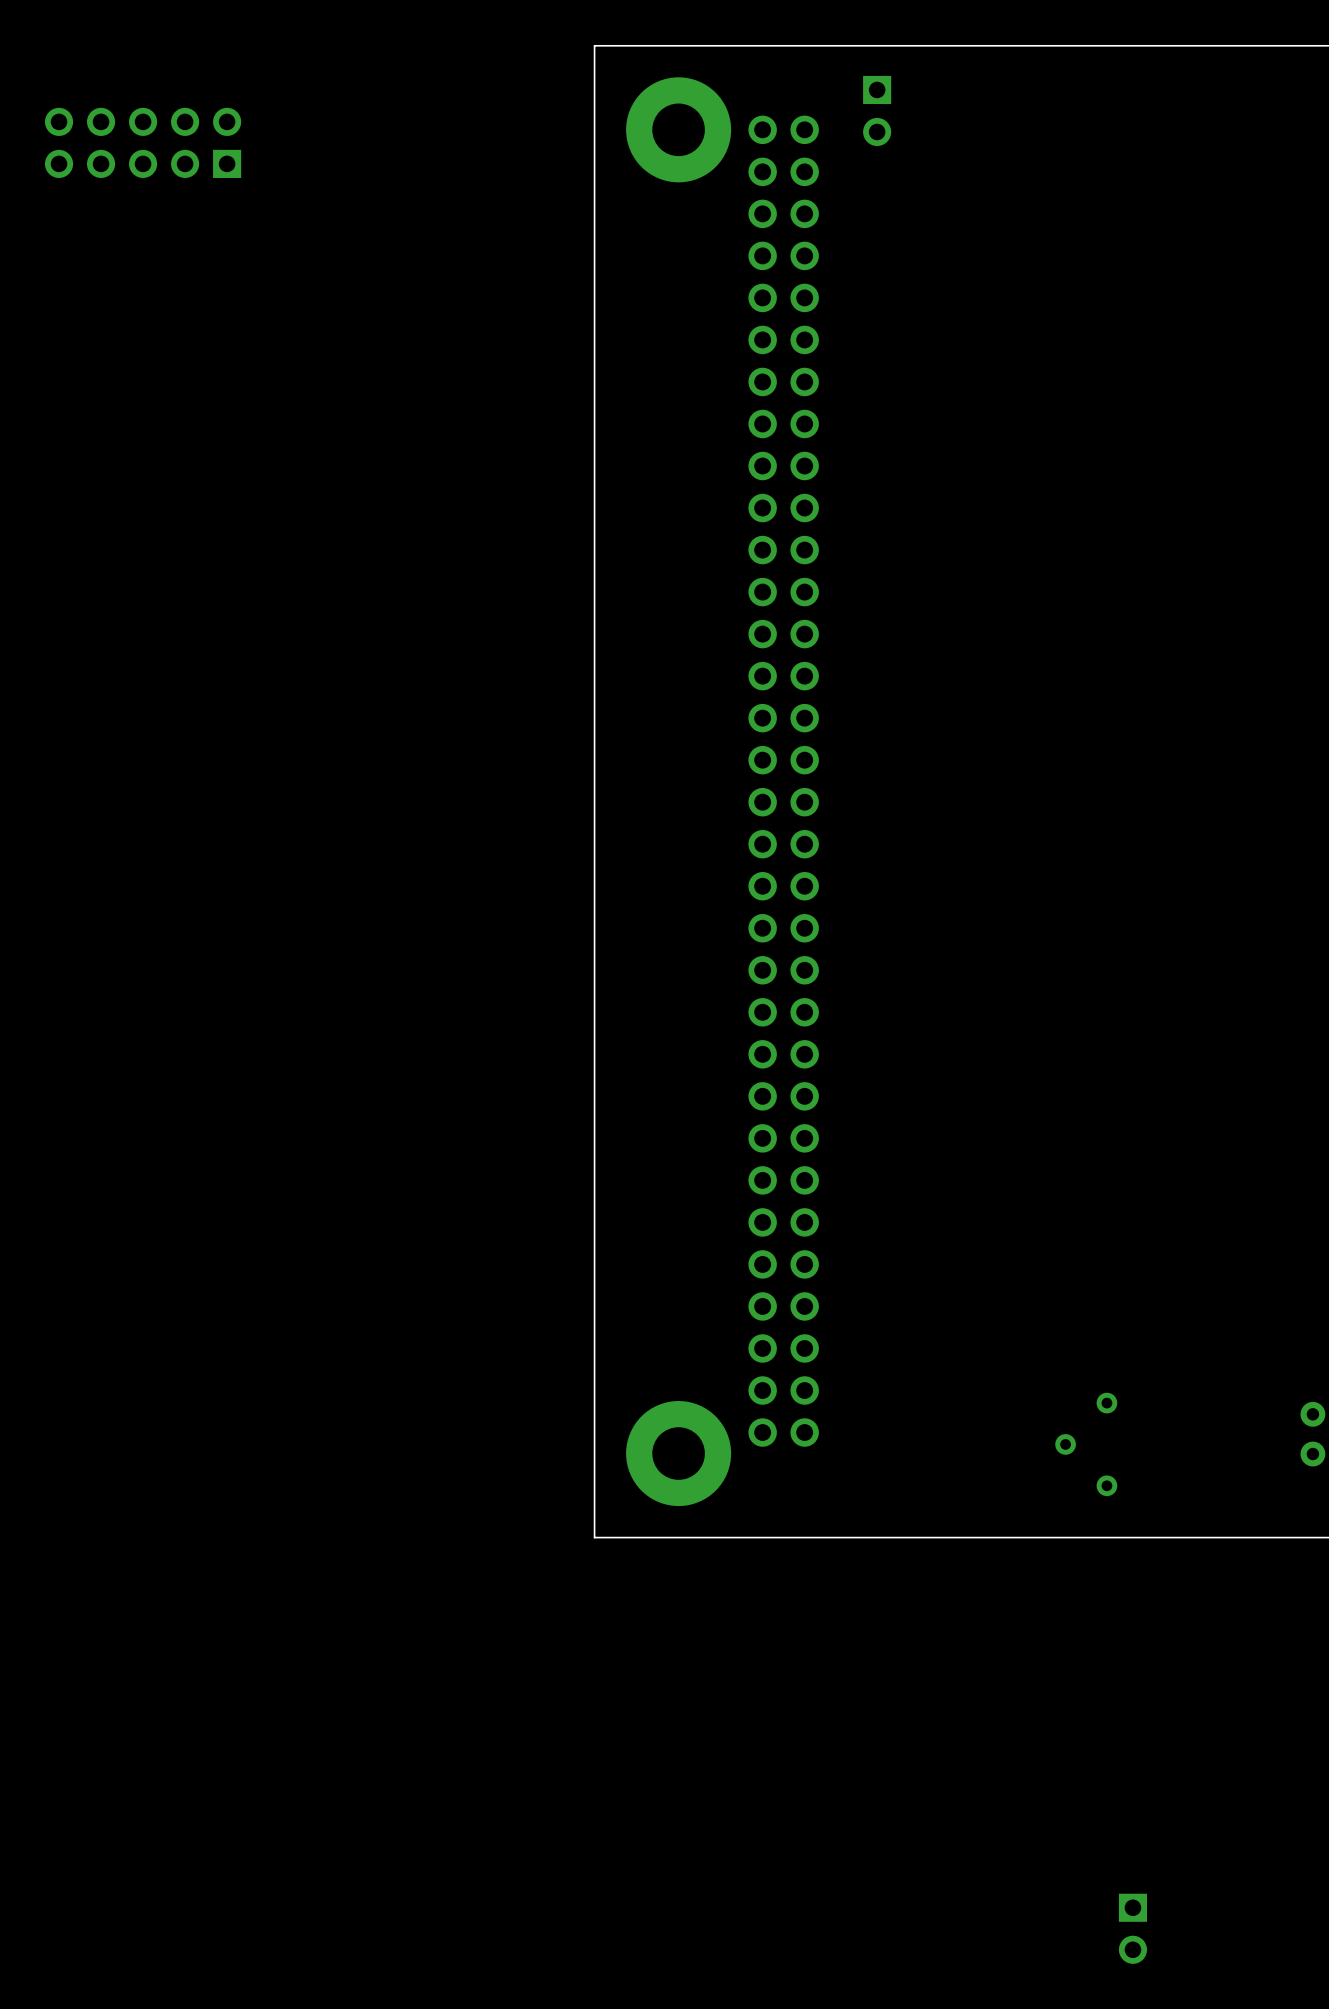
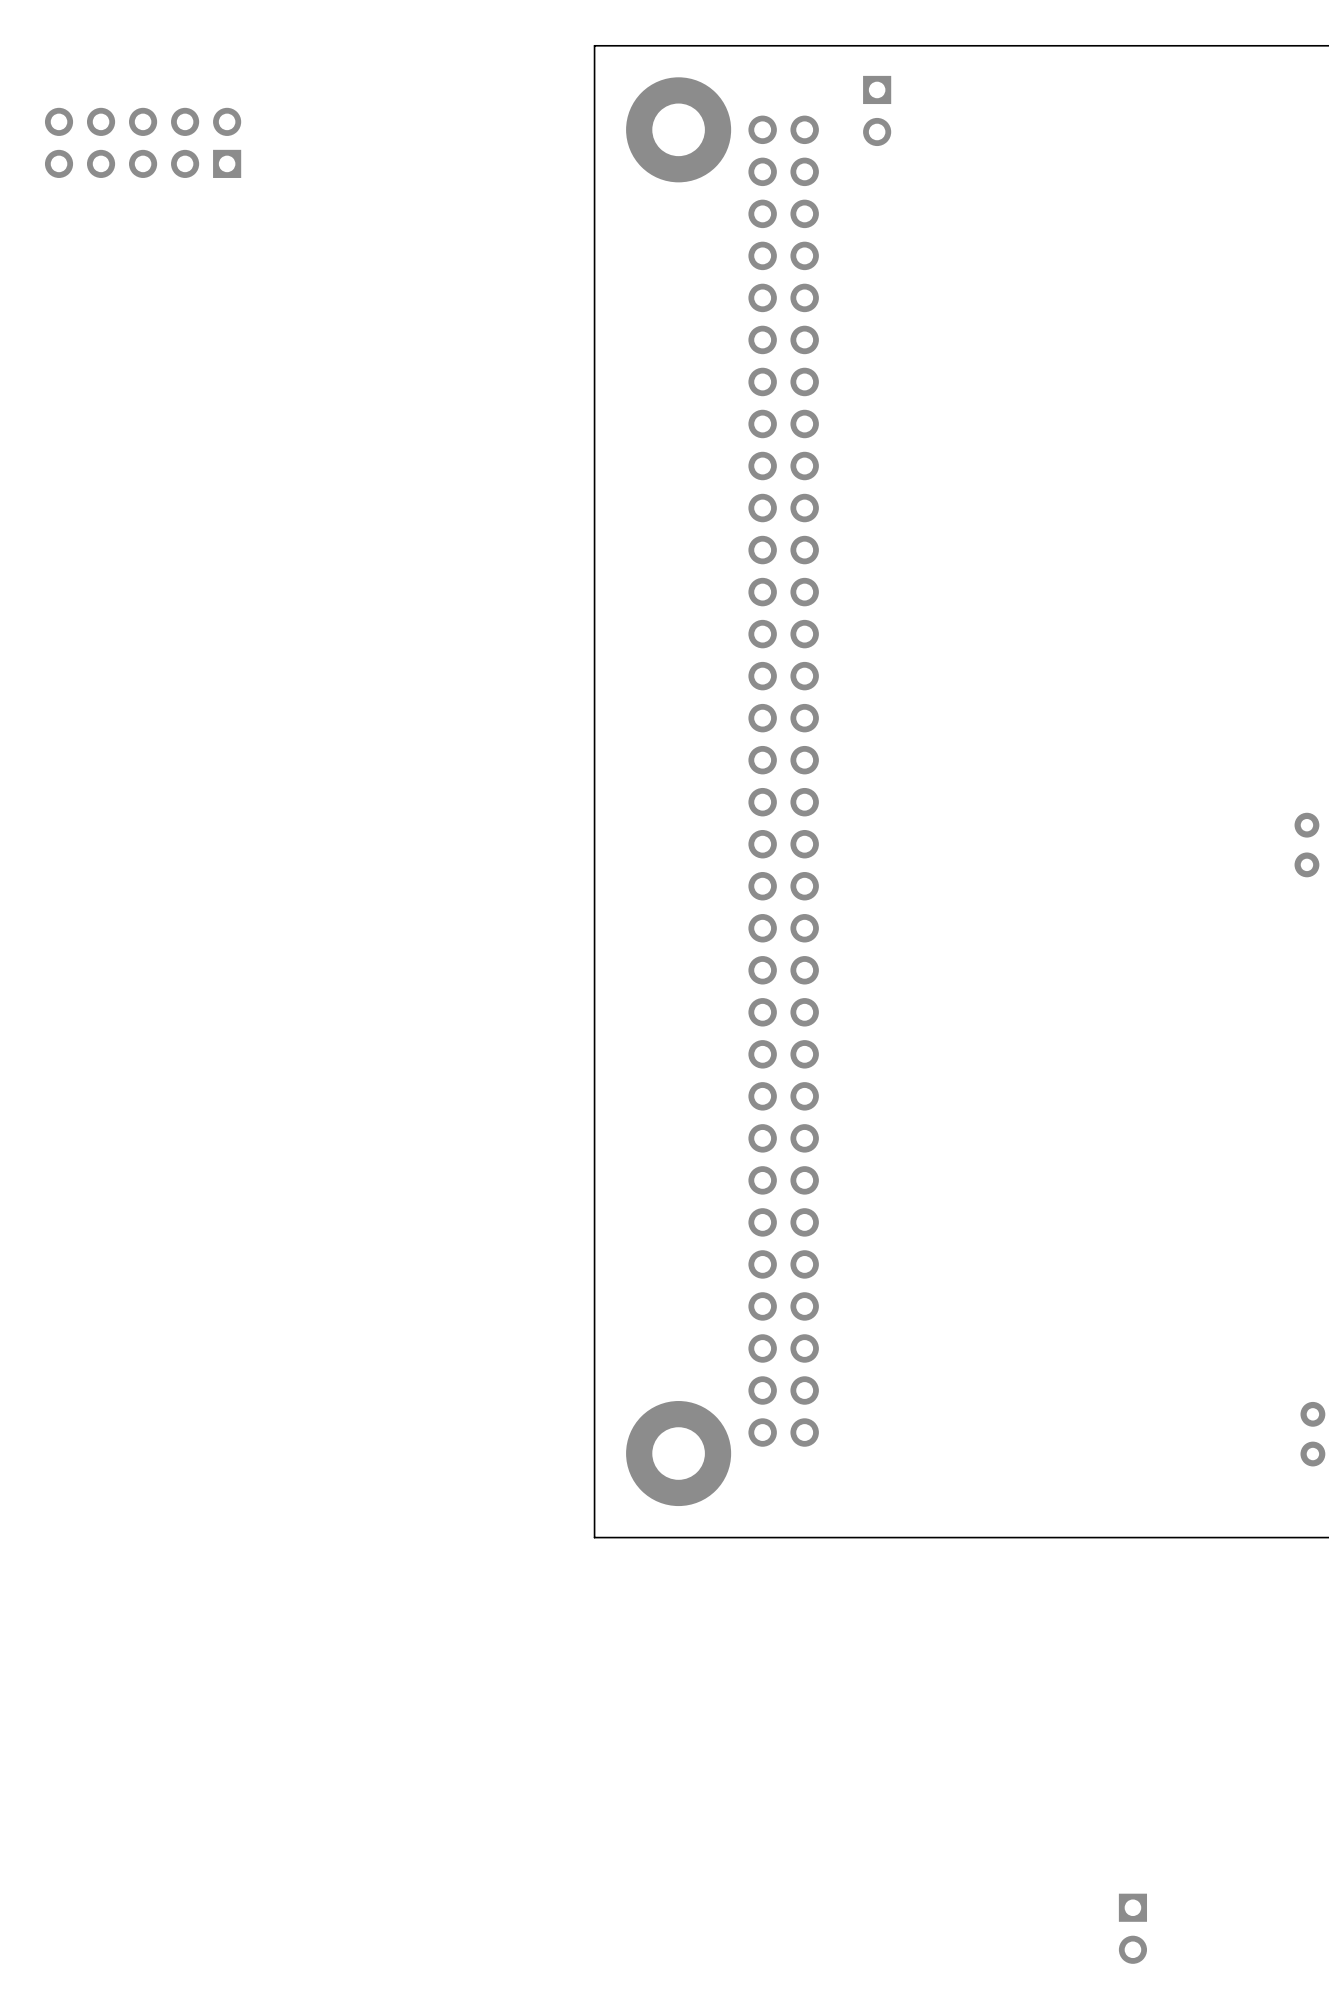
part: none -> (1306, 825)
part: none -> (1306, 864)
part: (1086, 1444) -> none

